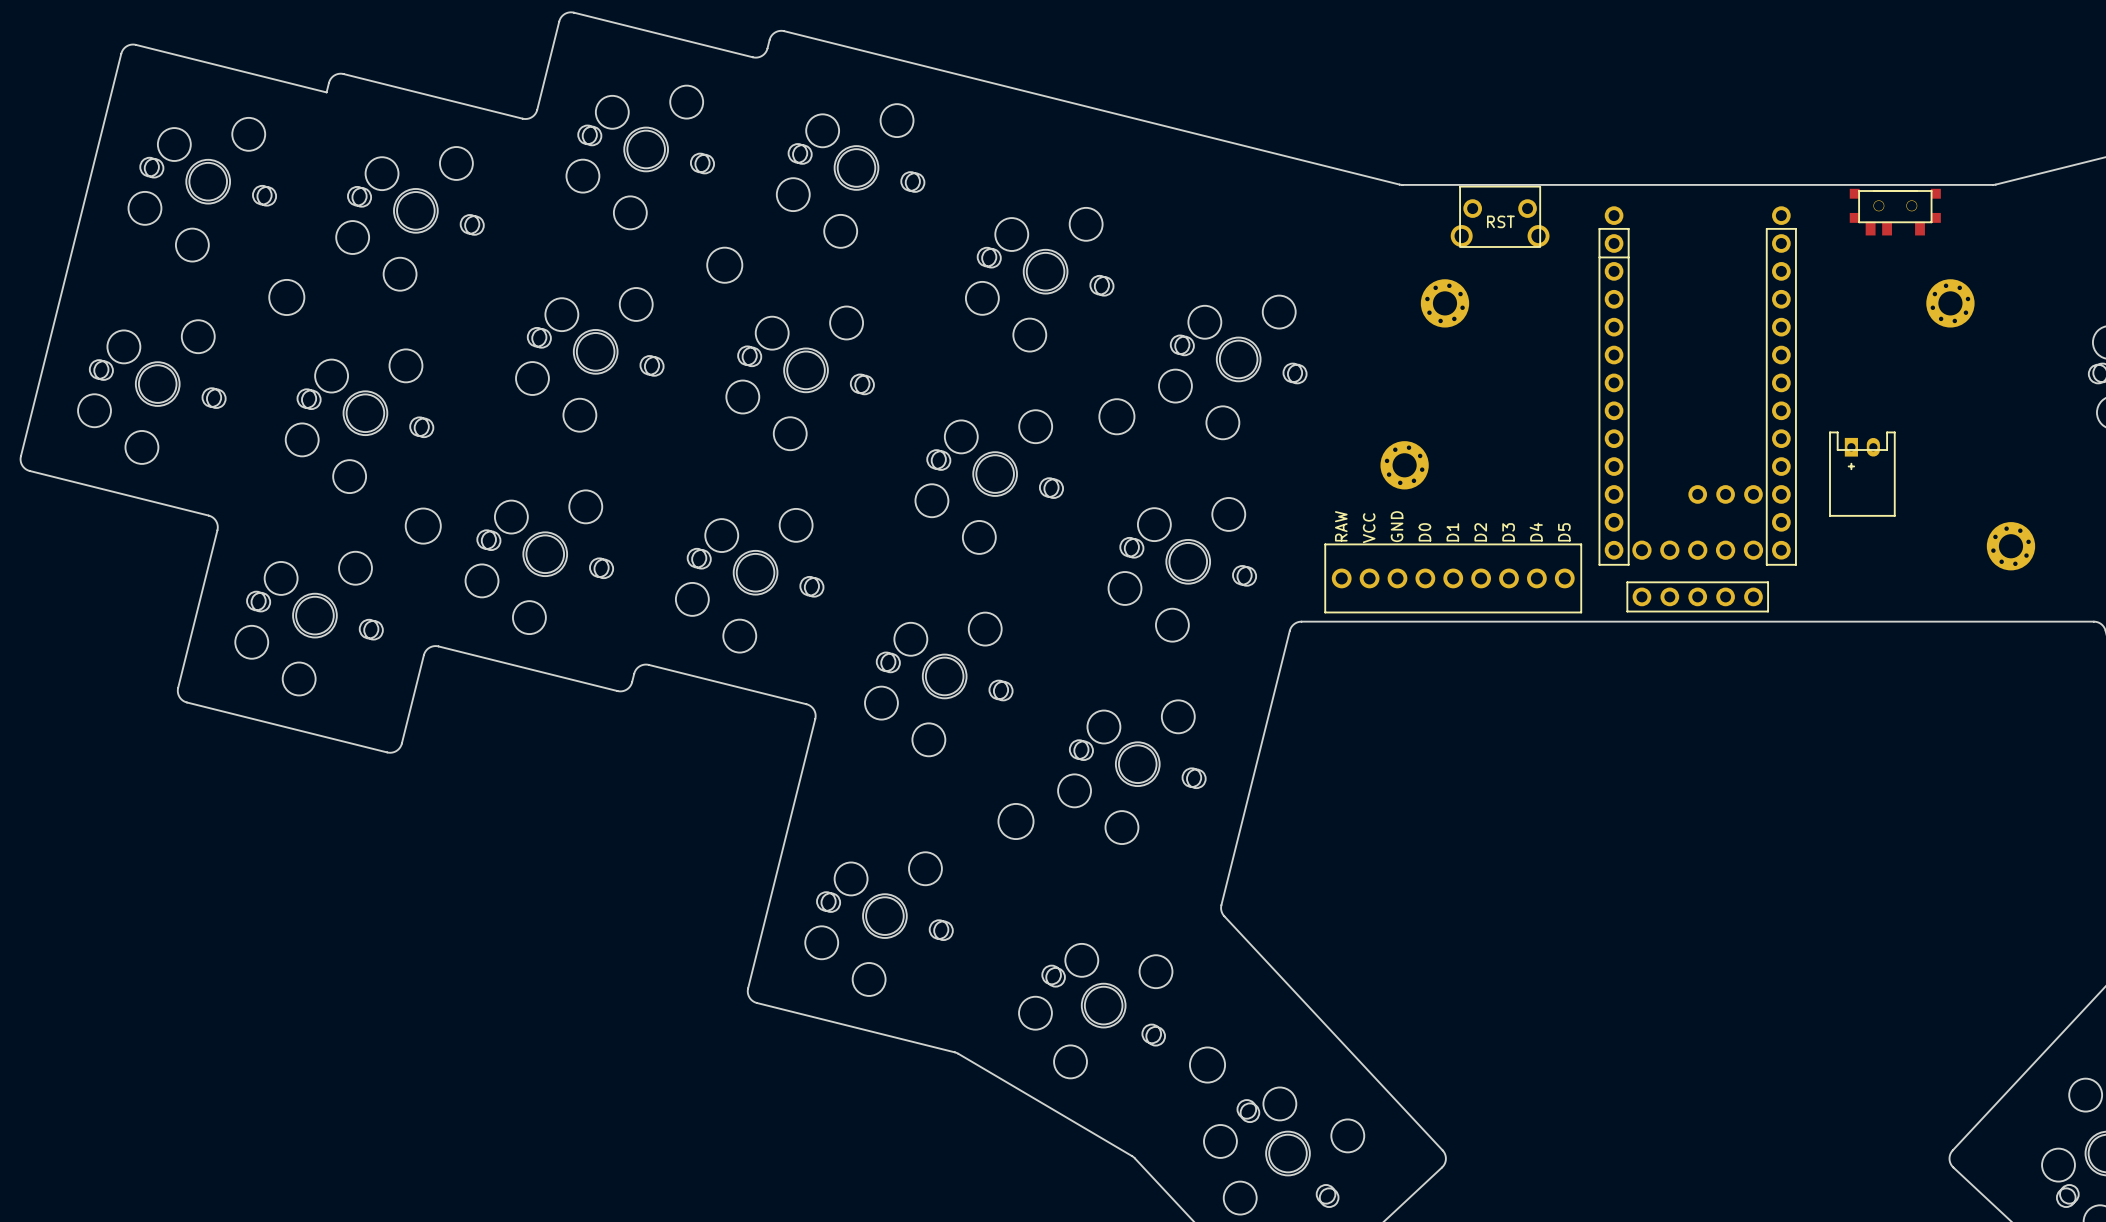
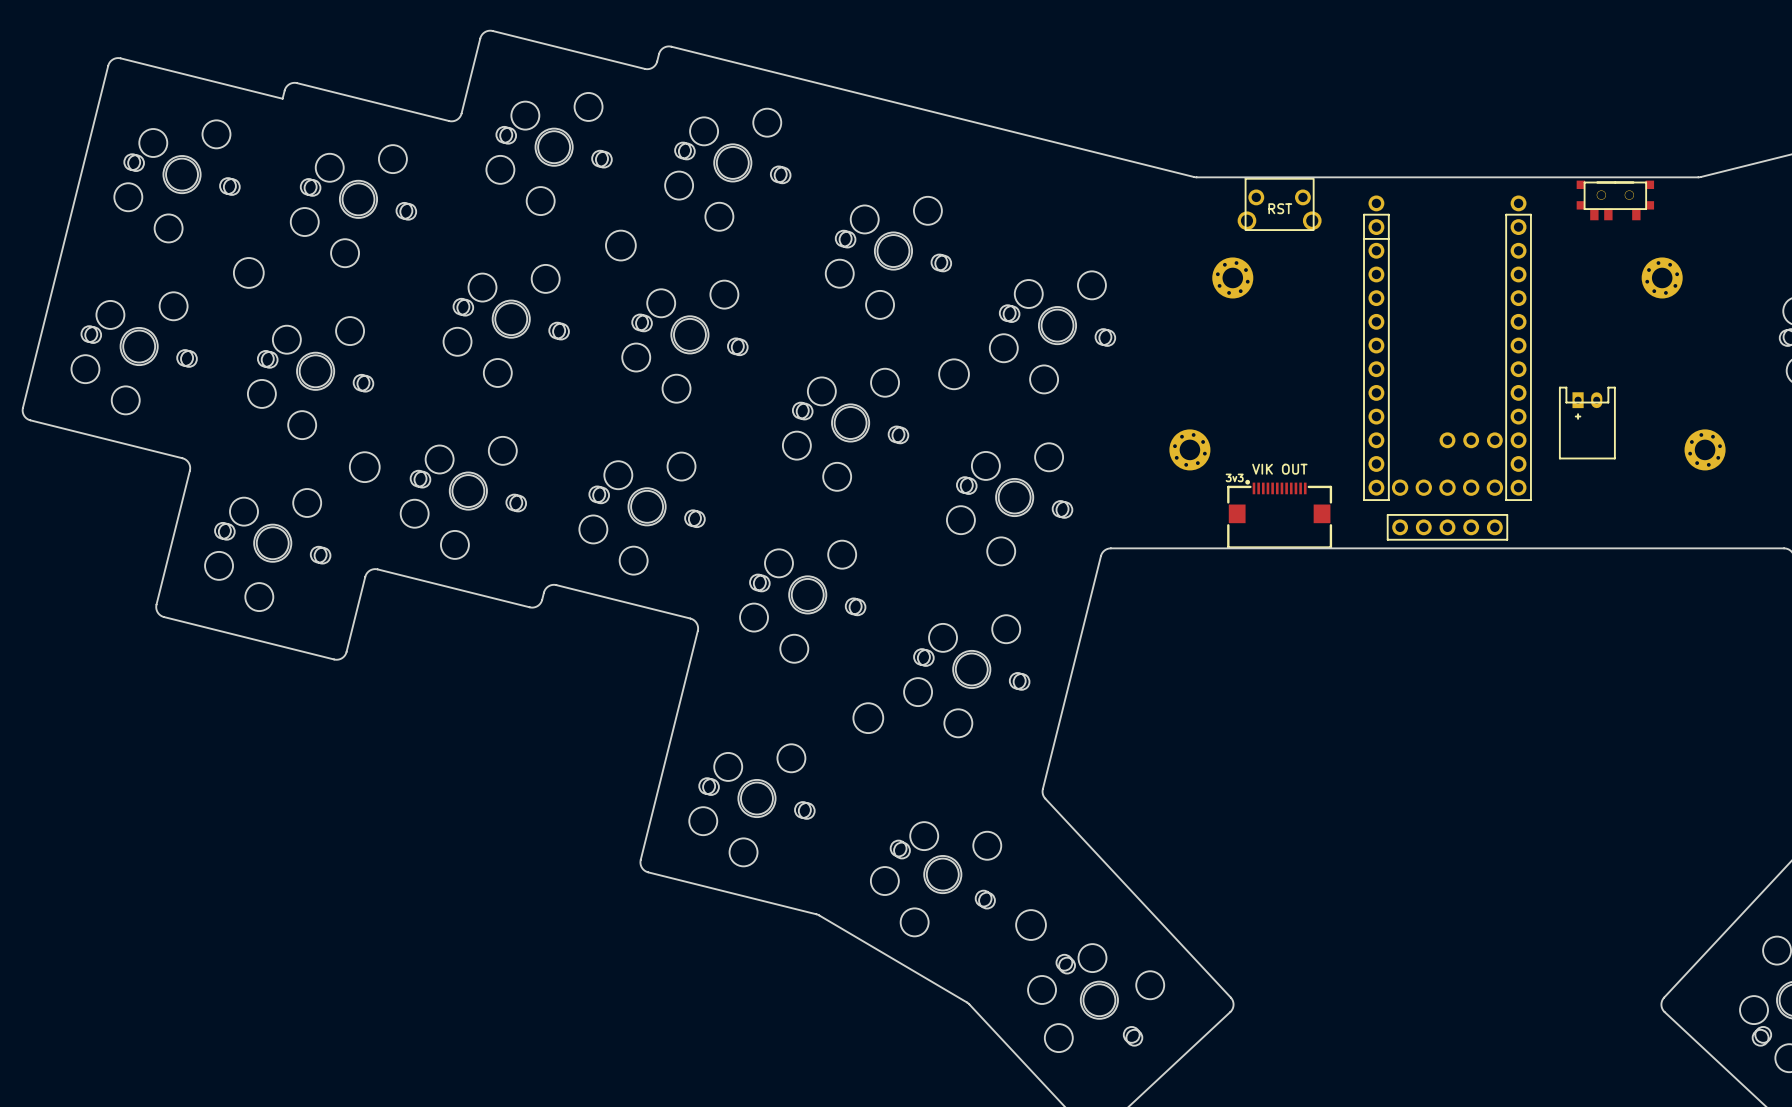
part position: (1404, 465) -> (1189, 449)
part position: (2010, 546) -> (1705, 449)
part: (1453, 578) -> none
part: none -> (1279, 514)

